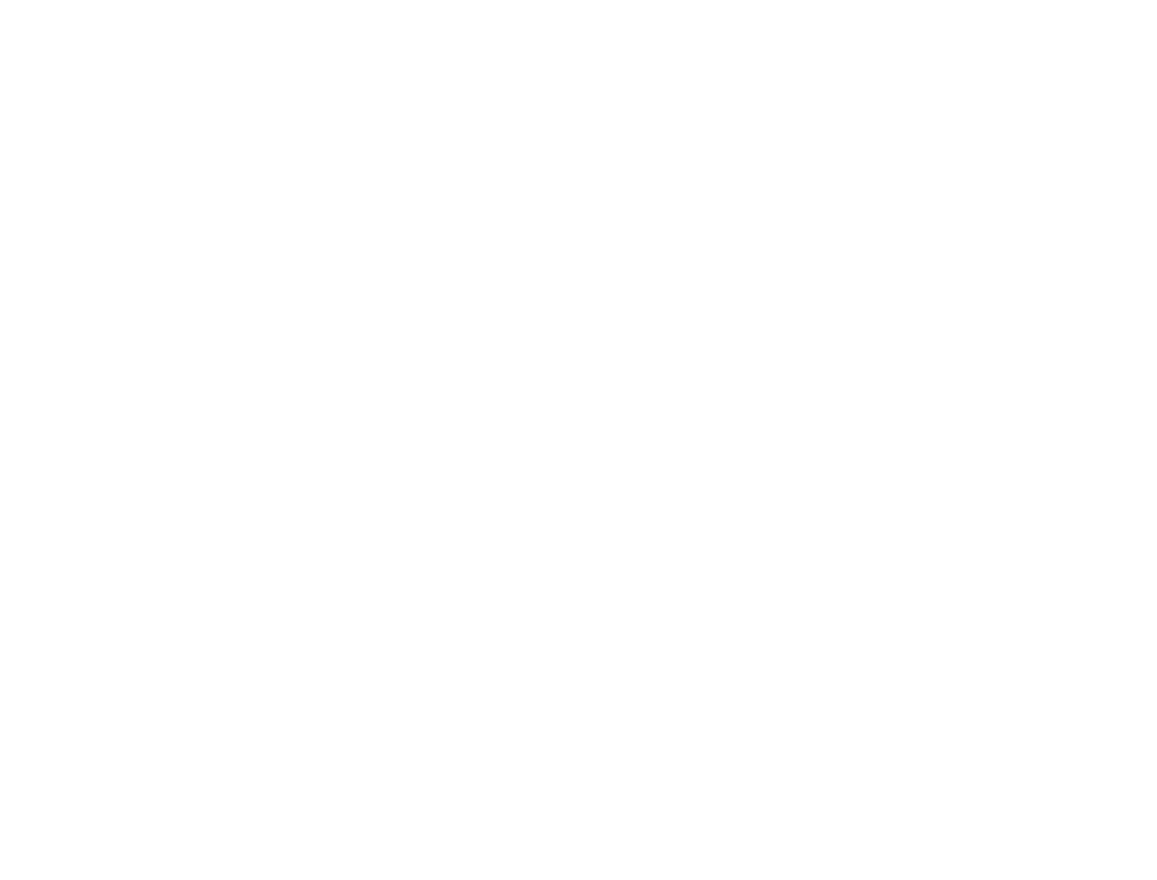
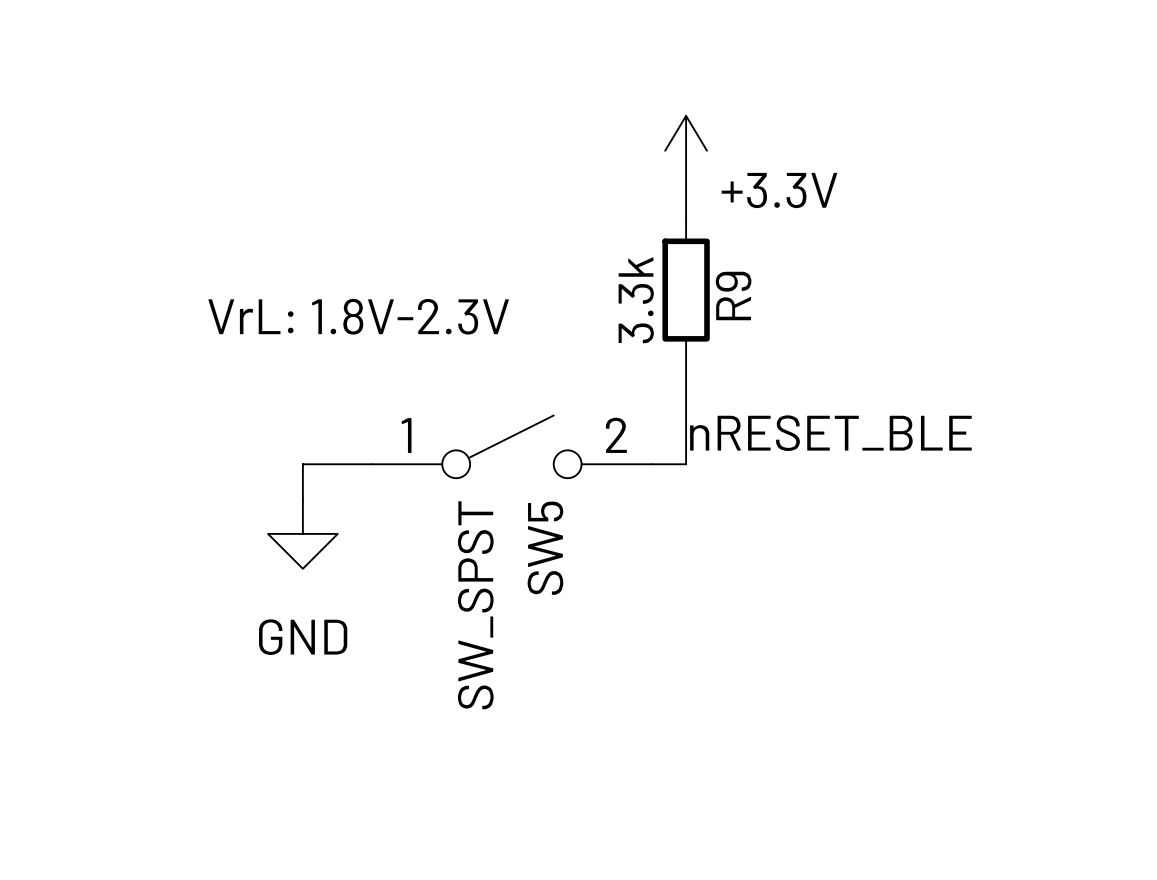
power symbol: none -> +3.3V (686, 150)
wire: none -> (686, 185) (686, 220)
R9: none -> 3.3k (686, 290)
text: none -> VrL: 1.8V-2.3V (358, 316)
wire: none -> (686, 359) (686, 464) (651, 464)
label: none -> nRESET_BLE (830, 433)
SW5: none -> SW_SPST (511, 446)
wire: none -> (372, 464) (302, 464) (302, 499)
power symbol: none -> GND (302, 533)

